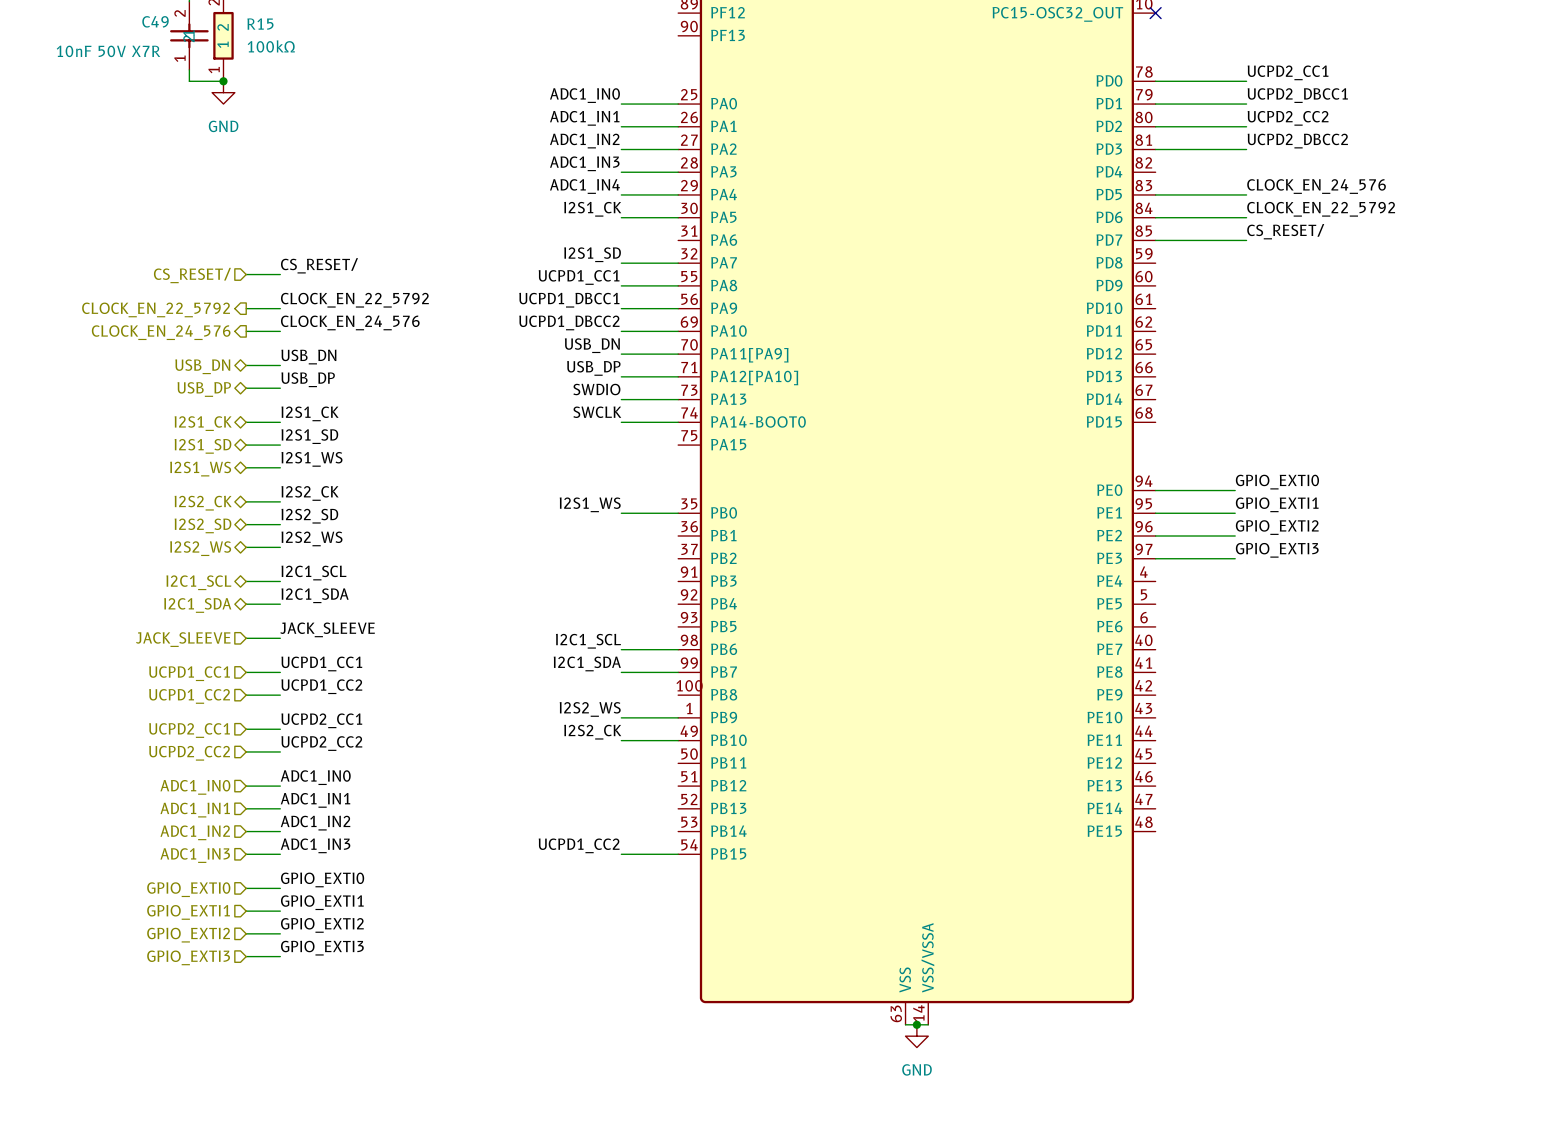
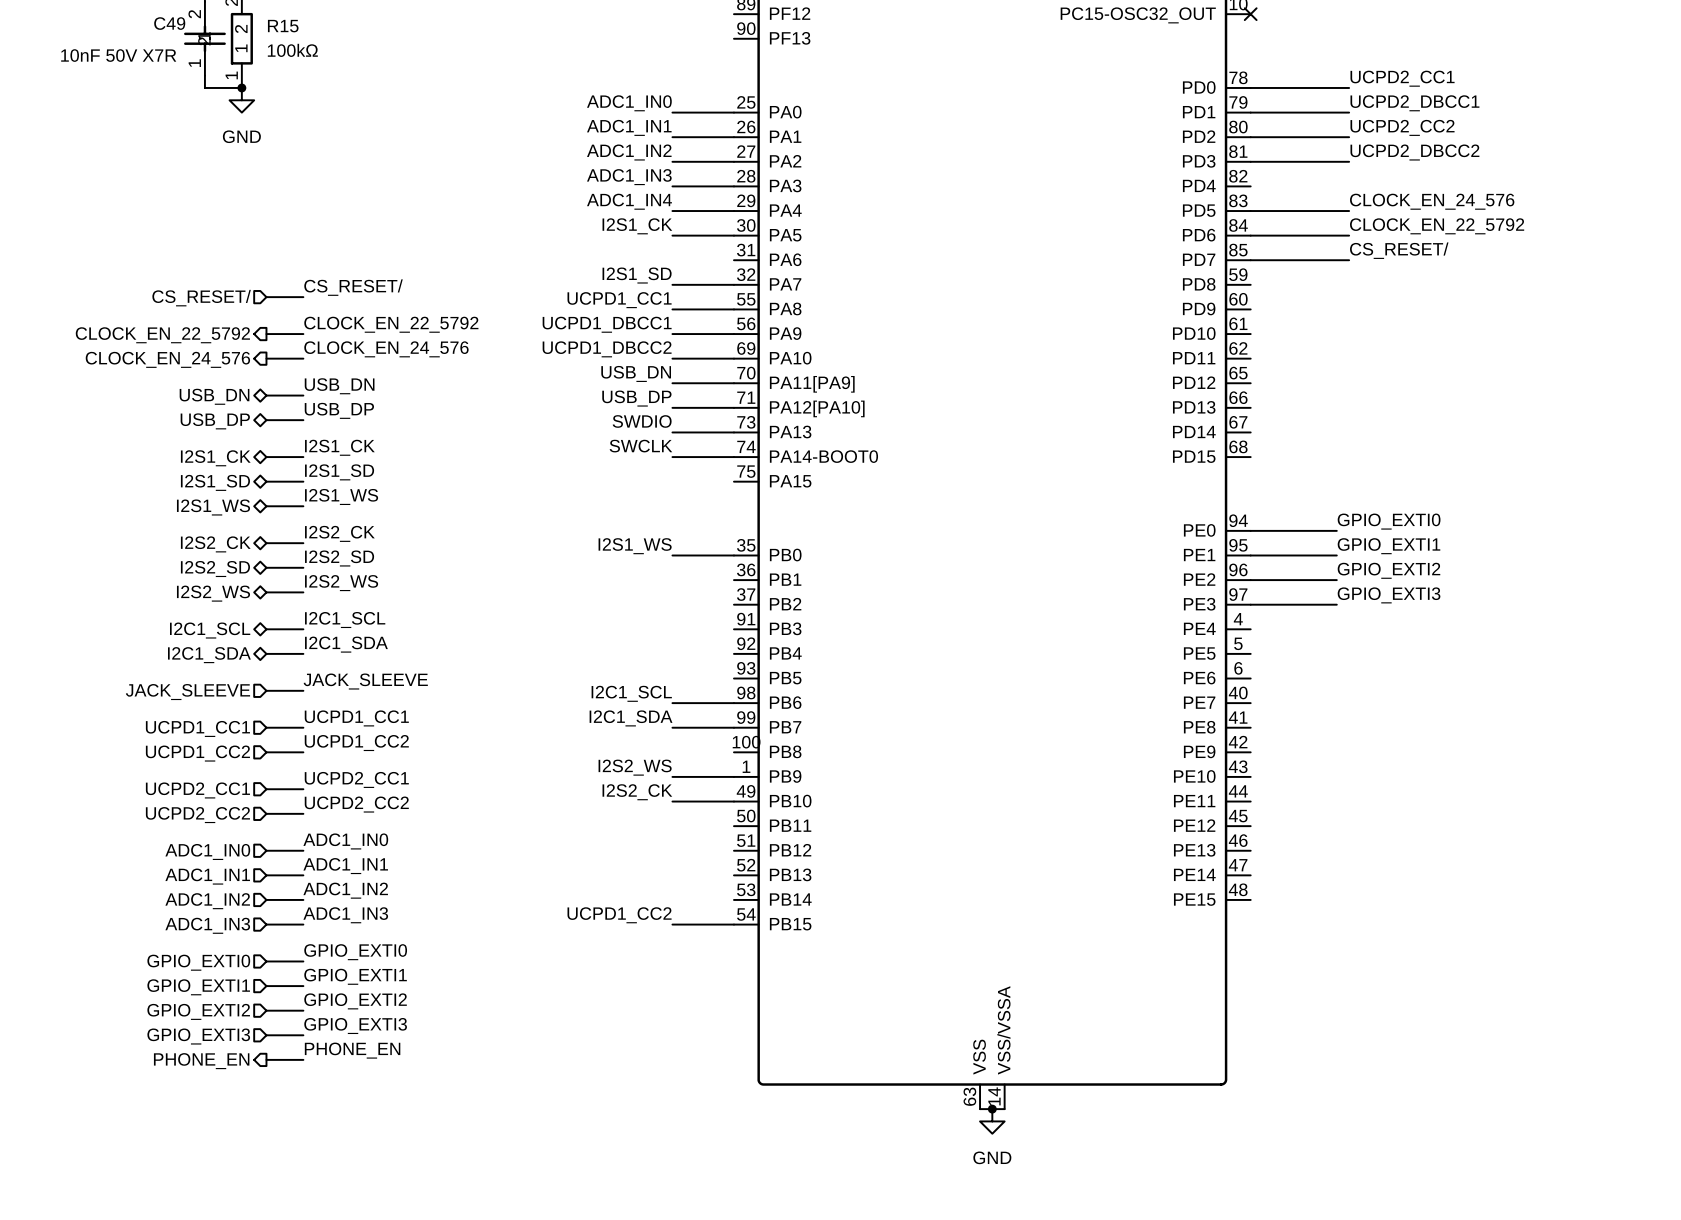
label: none -> PHONE_EN (352, 1050)
wire: none -> (266, 1059) (303, 1059)
hierarchical label: none -> PHONE_EN (201, 1061)

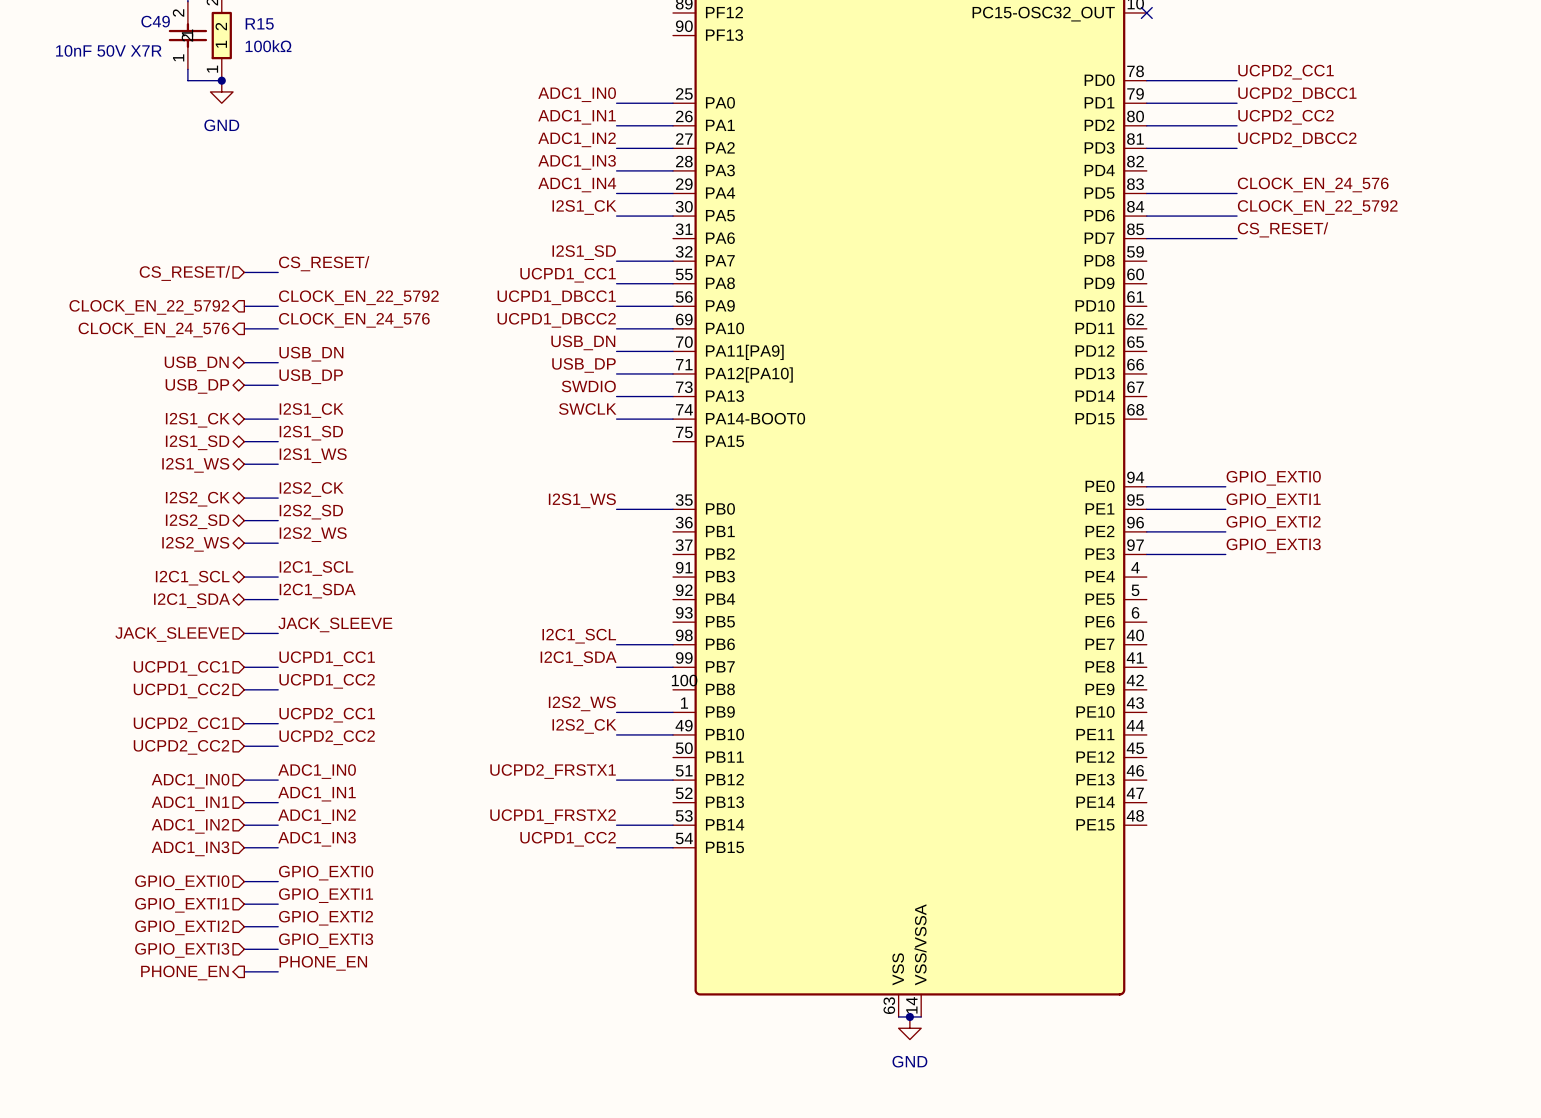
label: none -> UCPD2_FRSTX1 (553, 771)
wire: none -> (616, 780) (673, 780)
label: none -> UCPD1_FRSTX2 (553, 816)
wire: none -> (616, 825) (673, 825)

